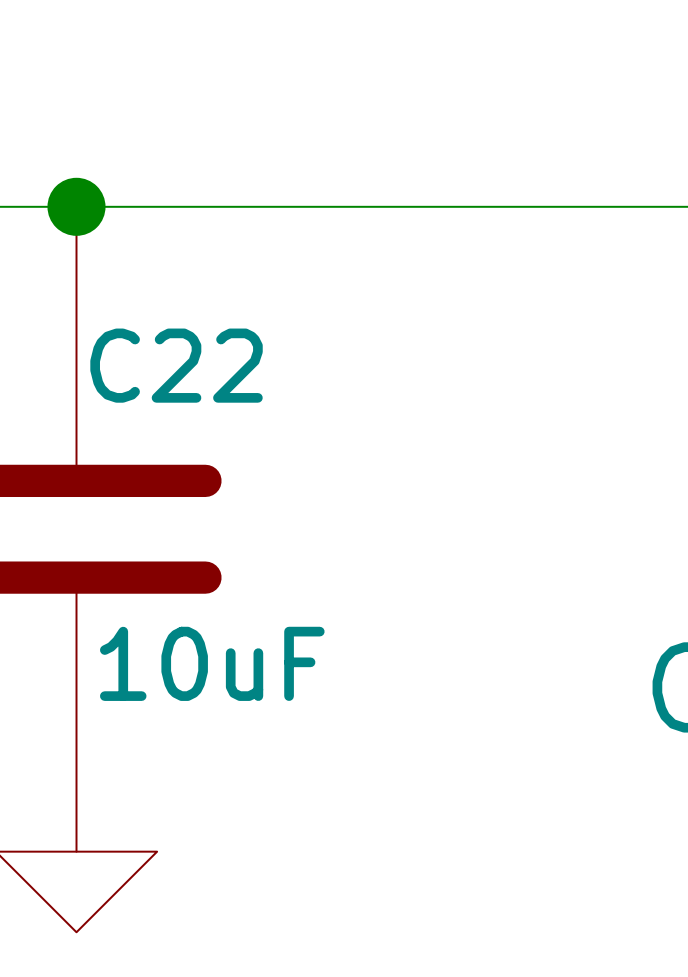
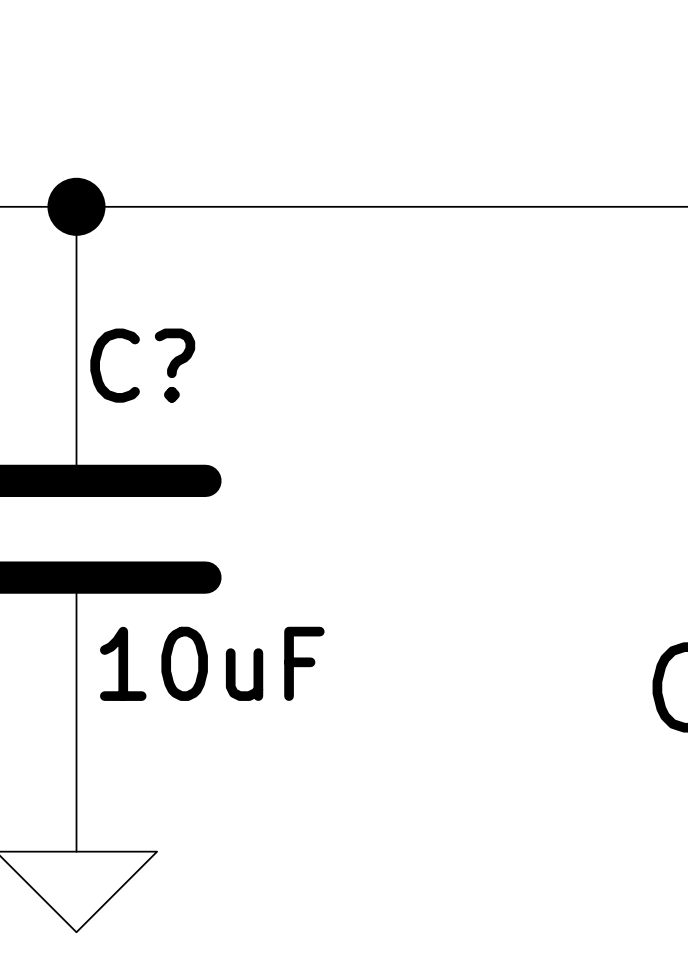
C22 name: C22 (176, 365) -> C? (142, 365)

